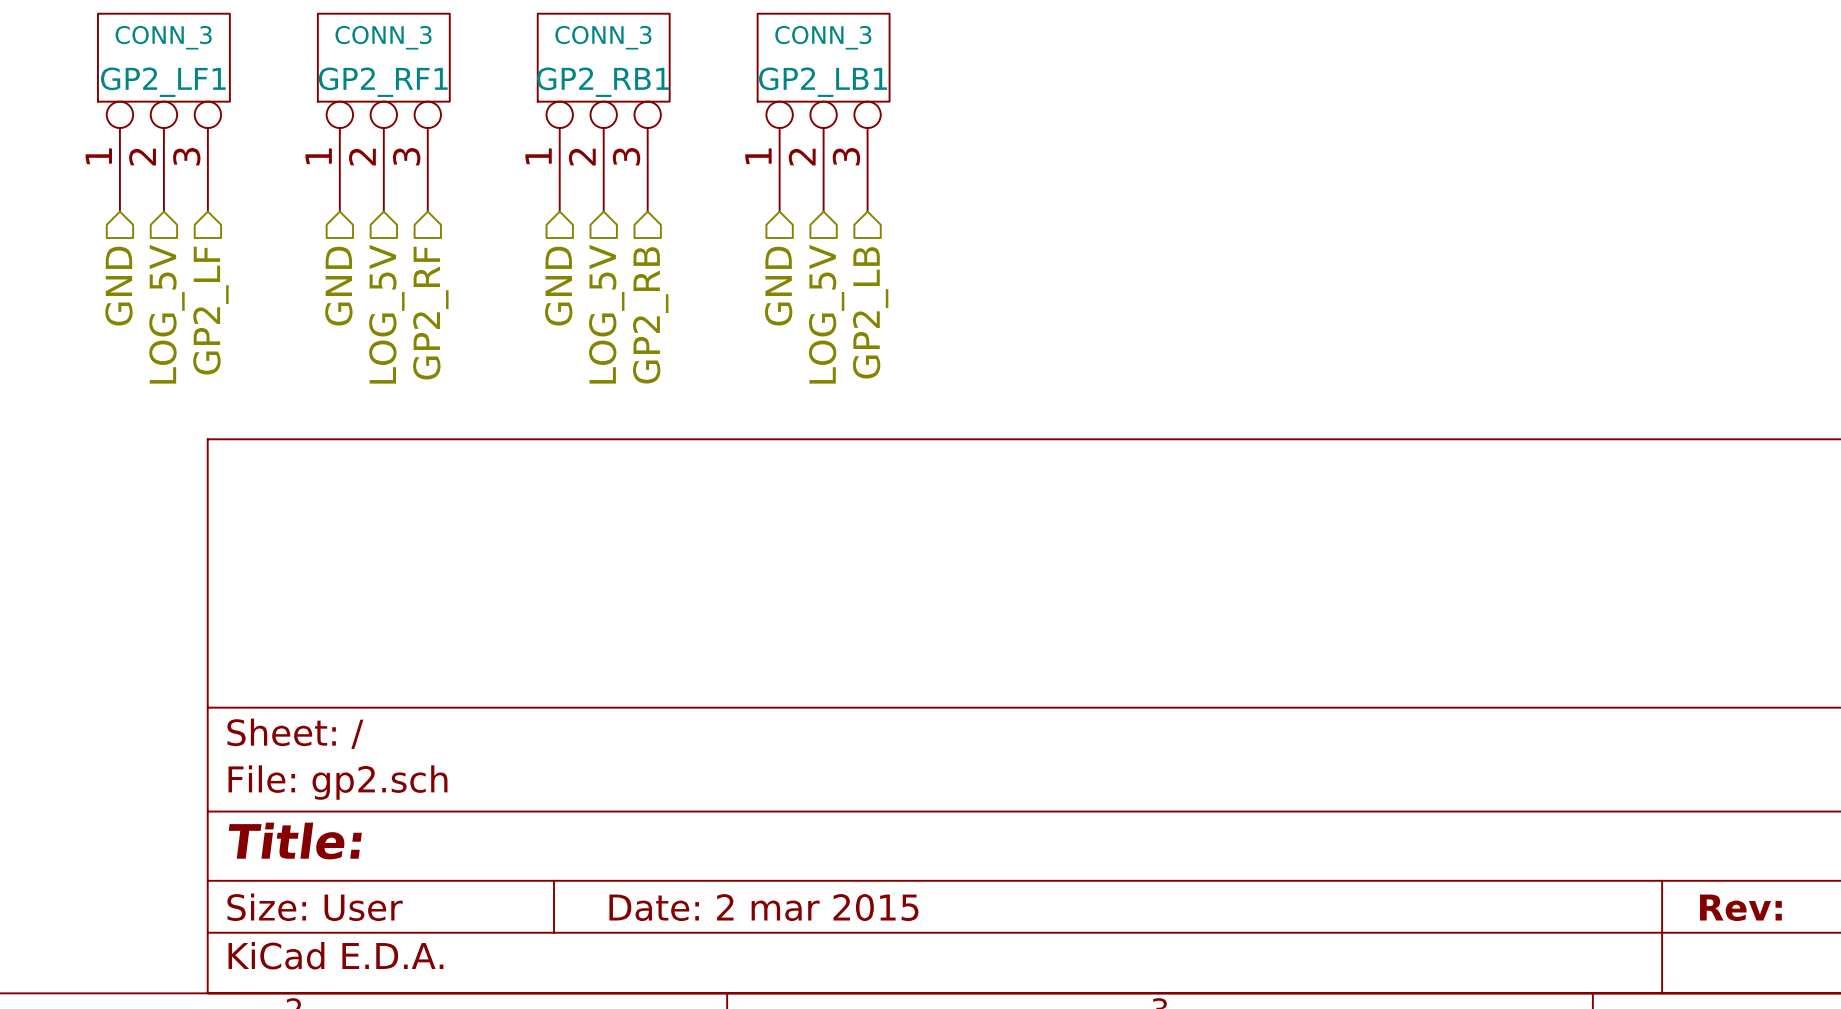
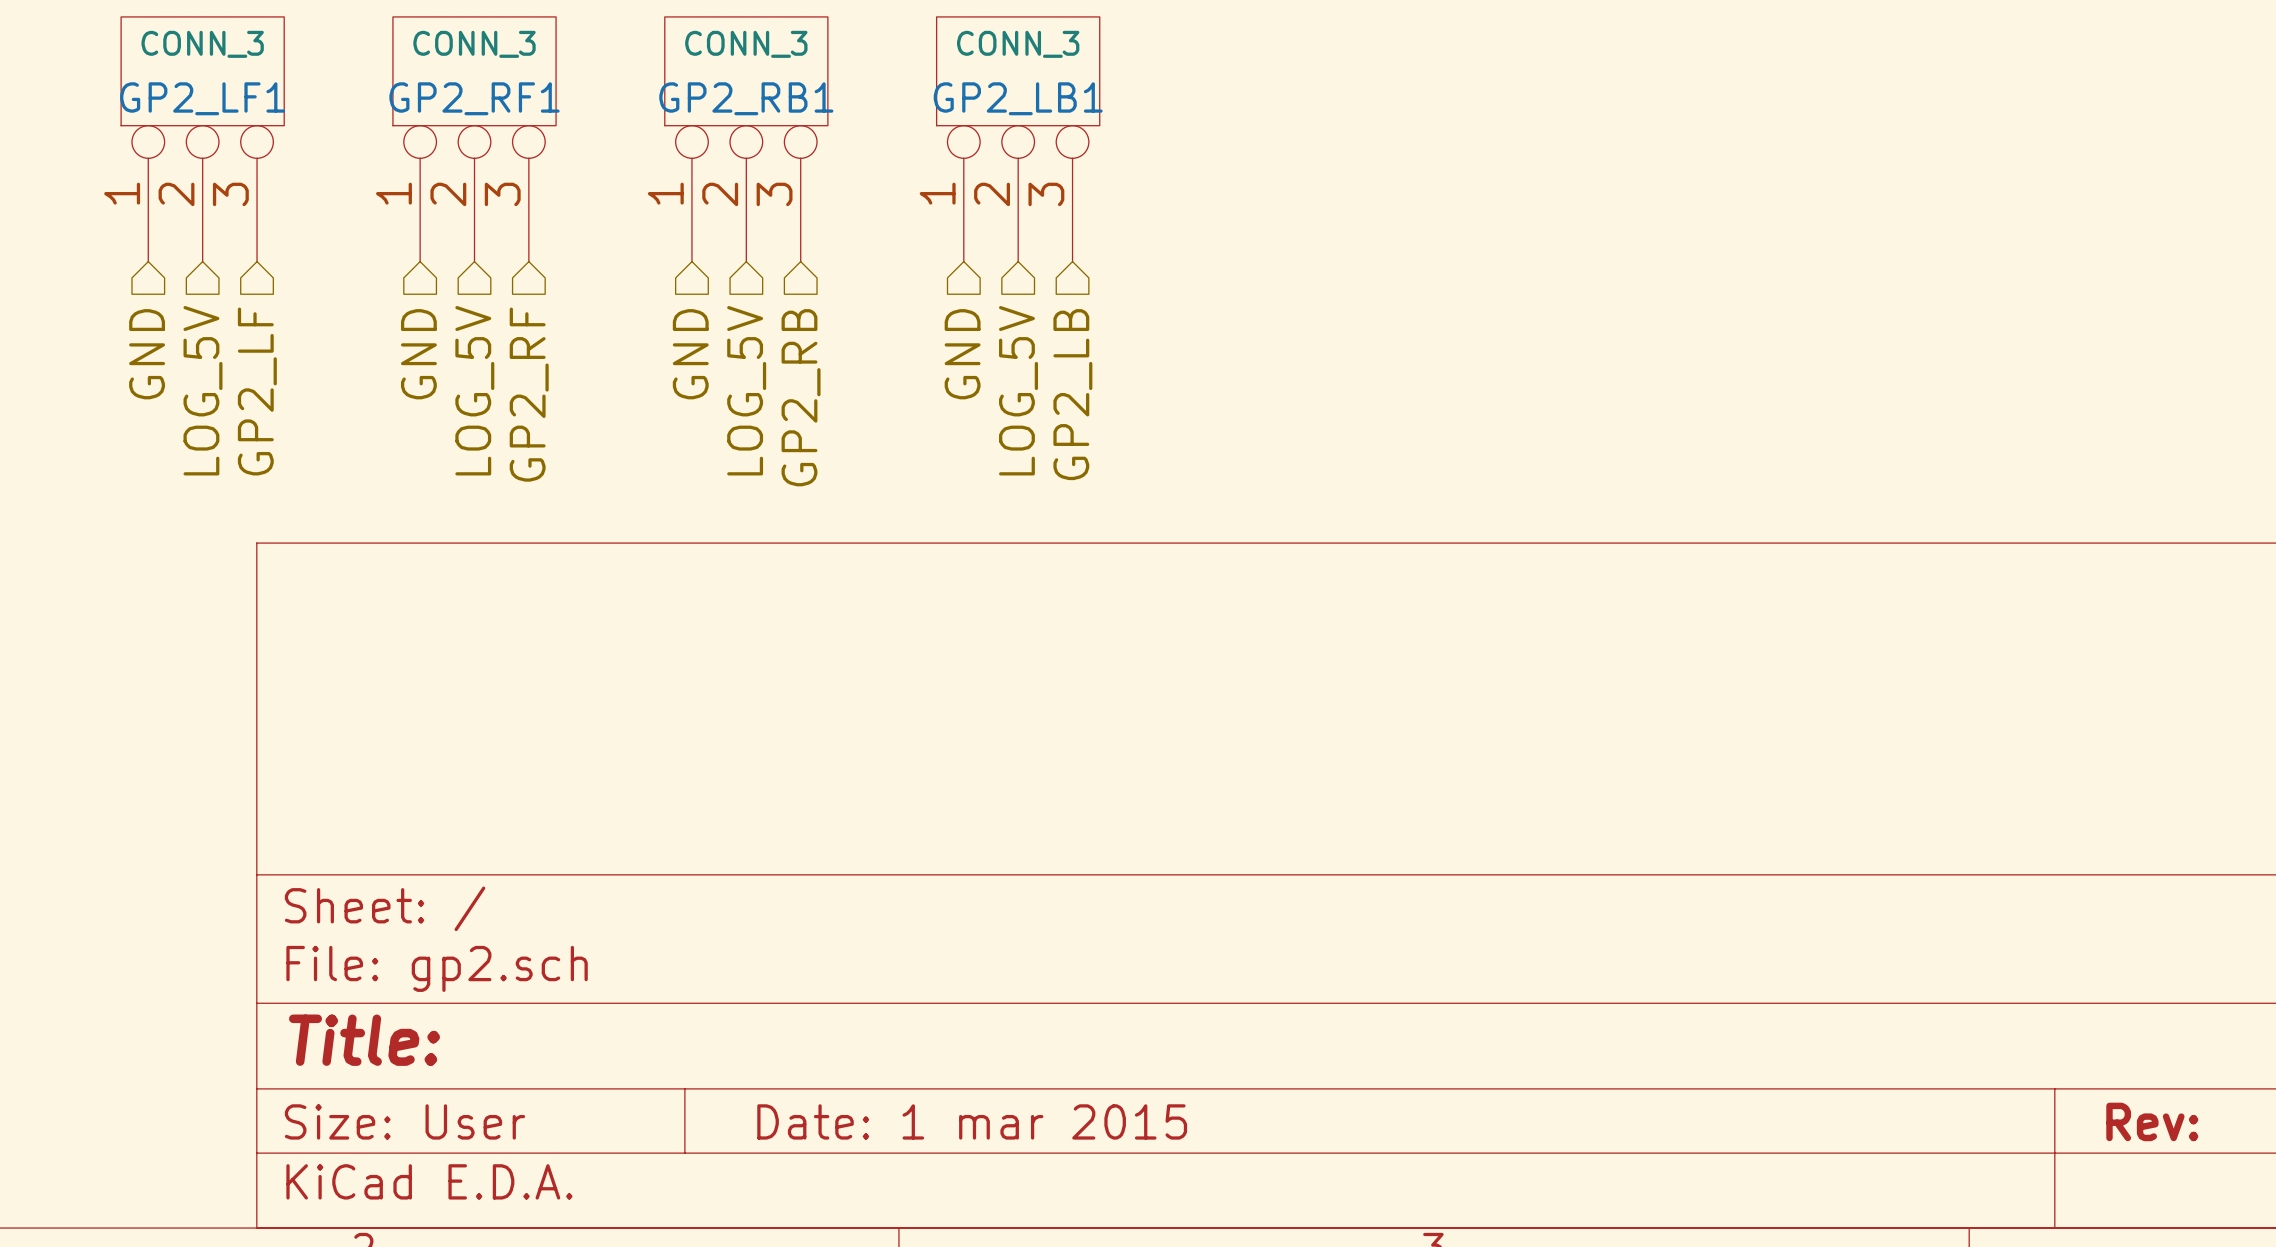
title block: Date: 2 mar 2015 (763, 907) -> Date: 1 mar 2015 (972, 1121)

